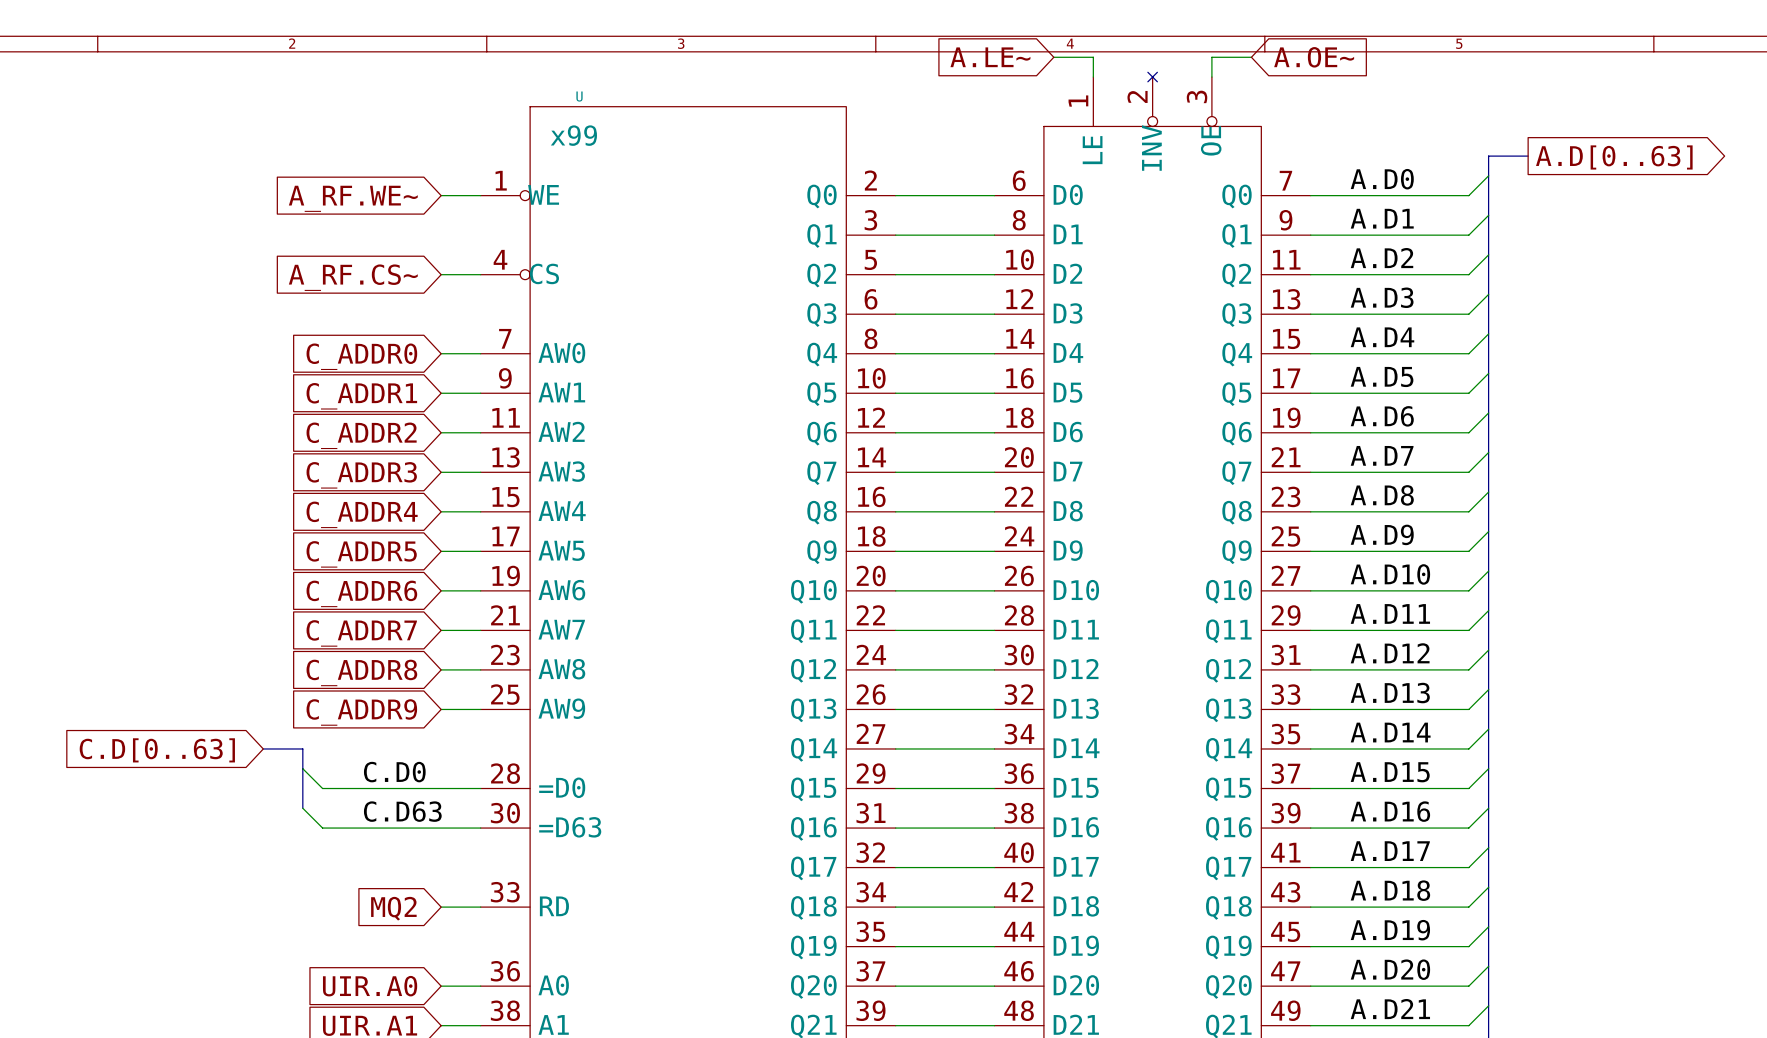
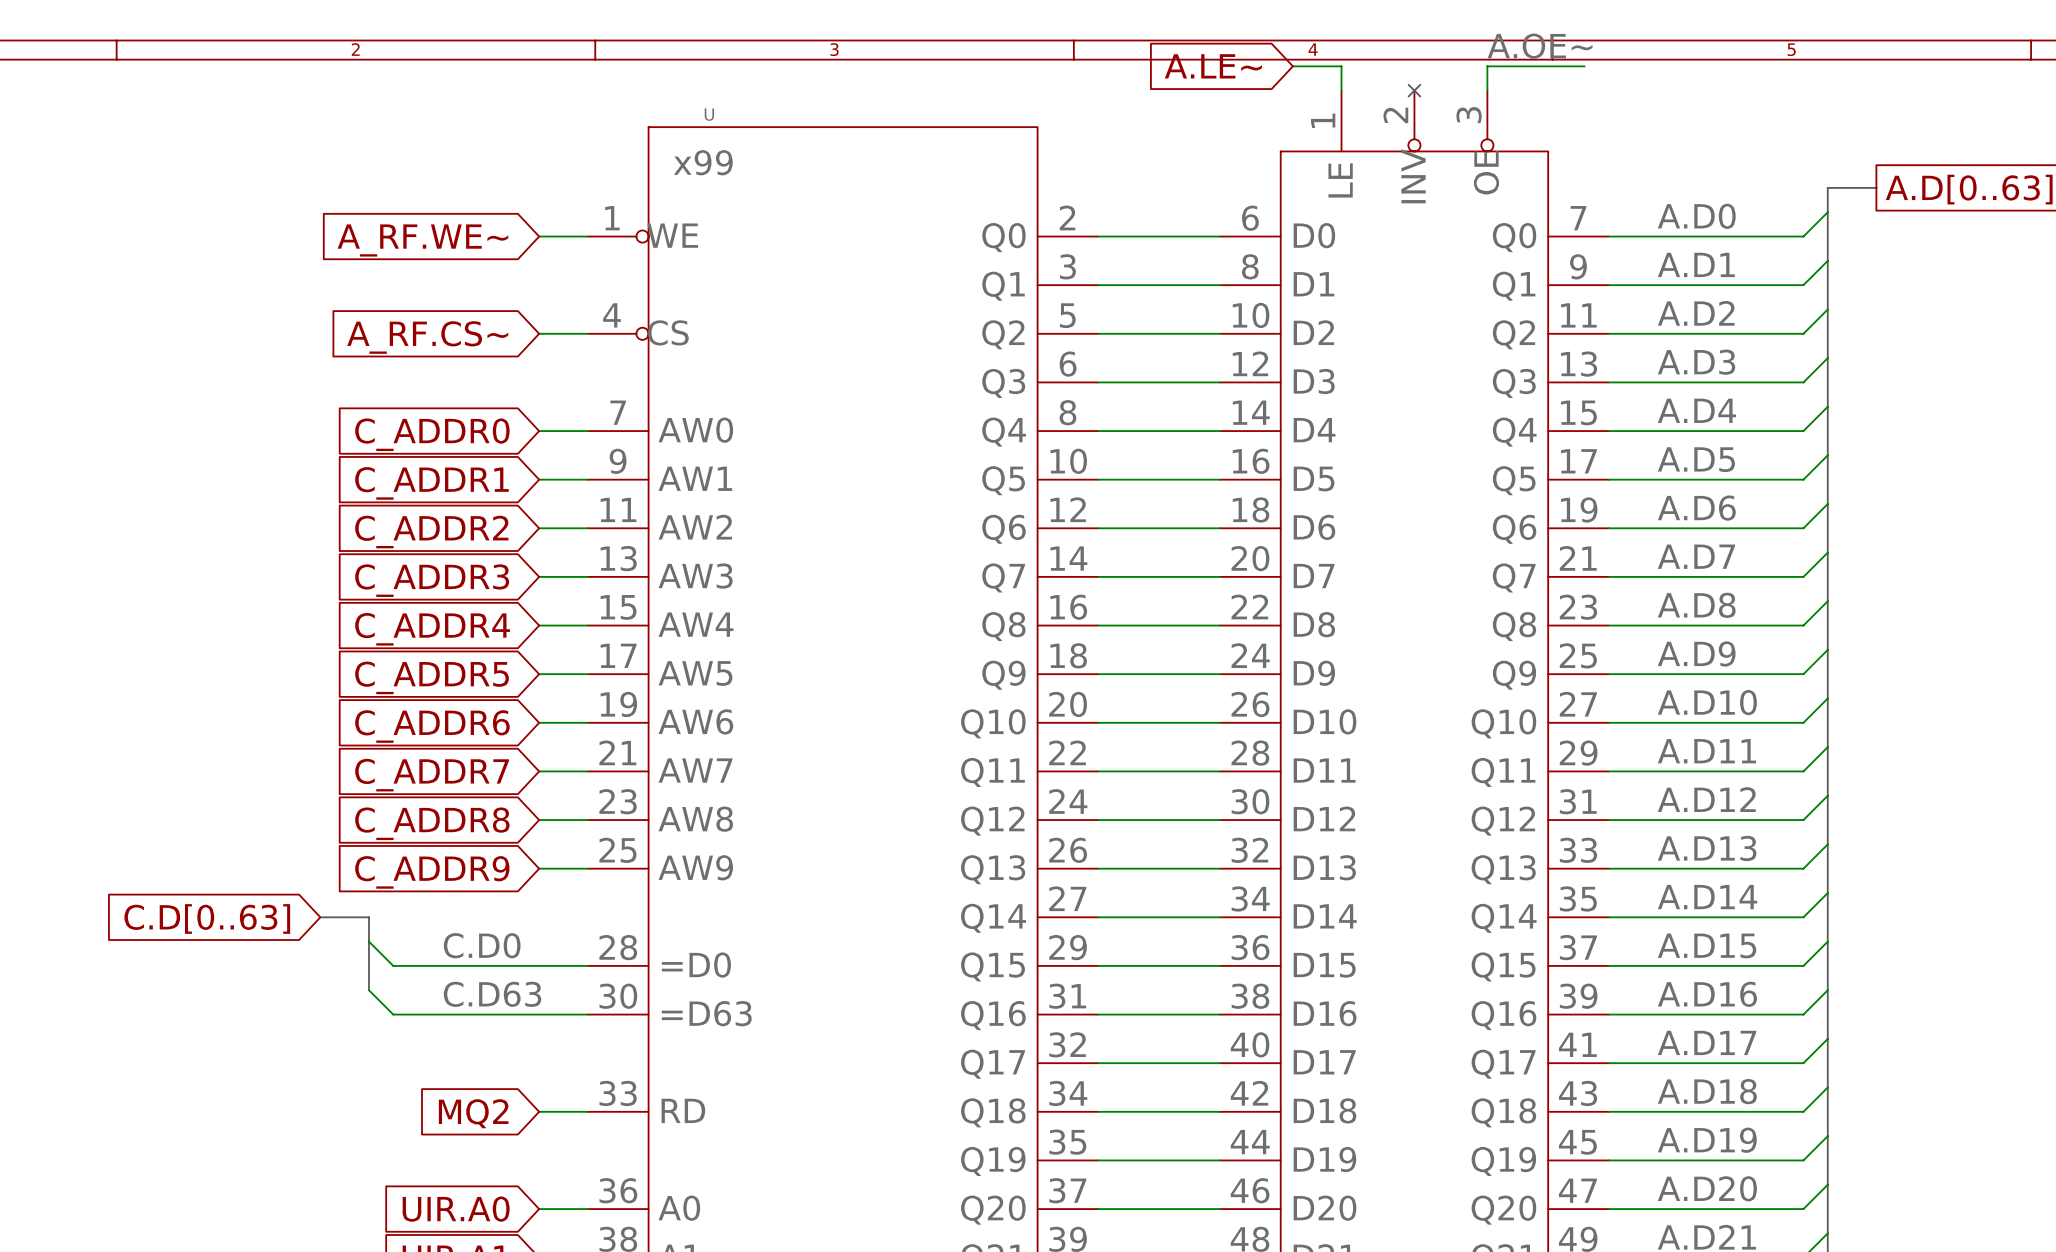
label: none -> A.OE~ (1540, 46)
wire: none -> (1536, 66) (1584, 66)
global label: A.OE~ (1314, 57) -> none

